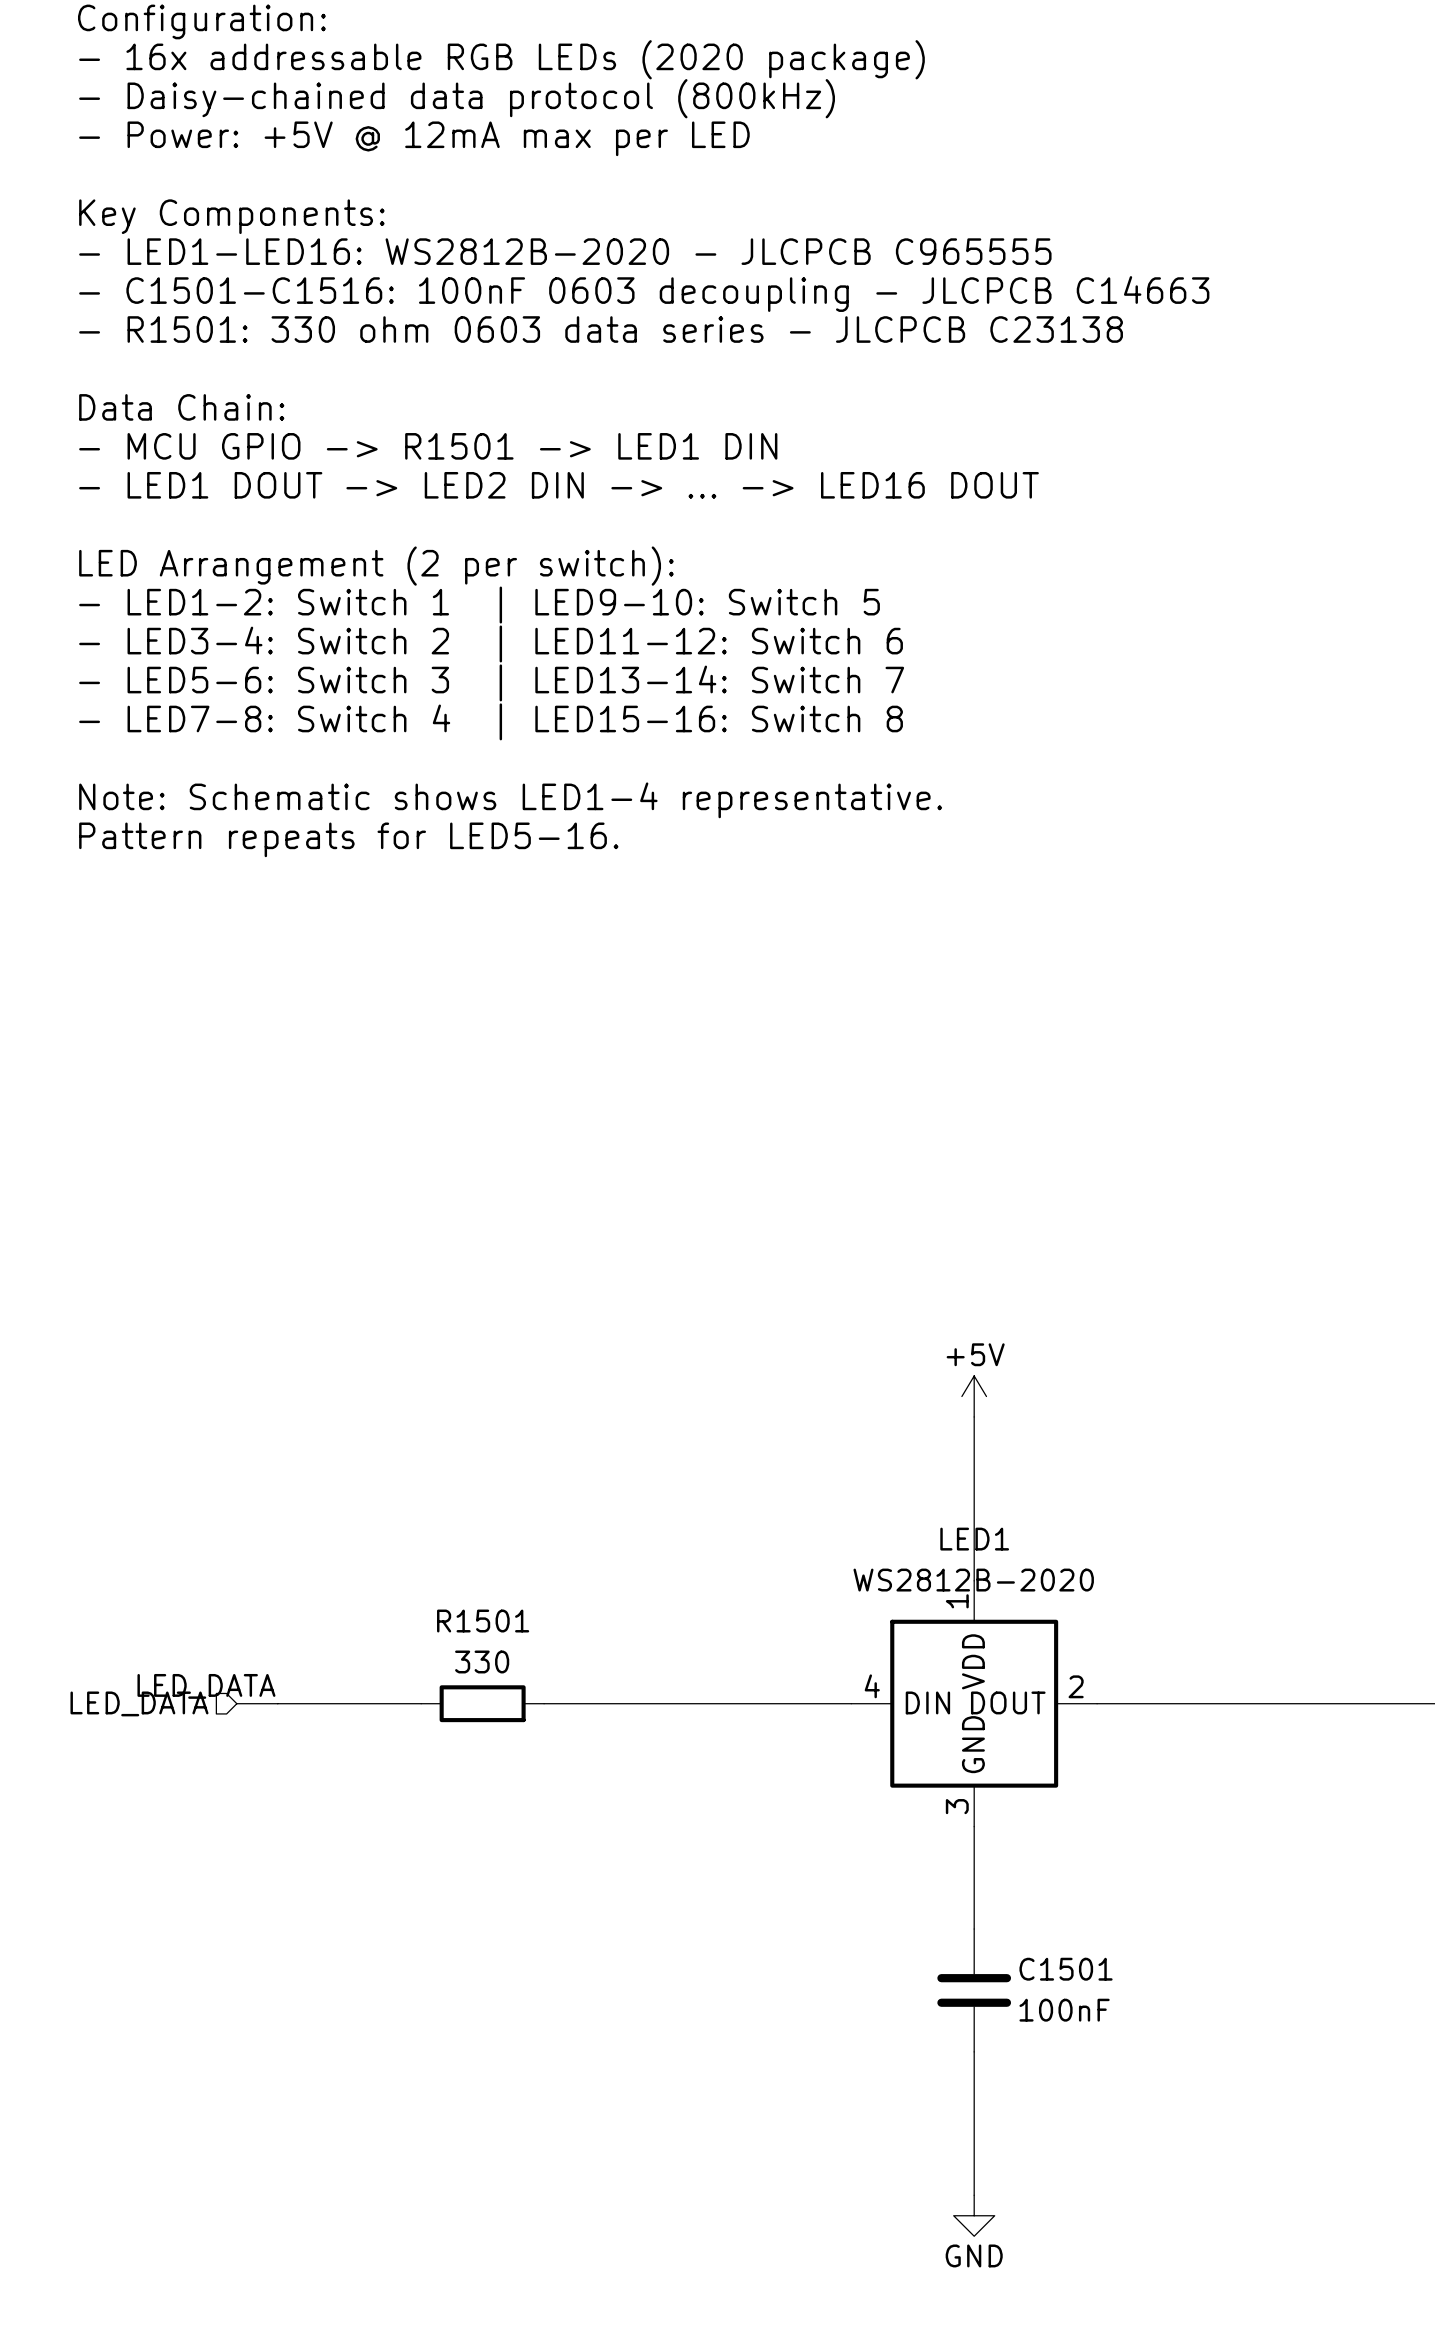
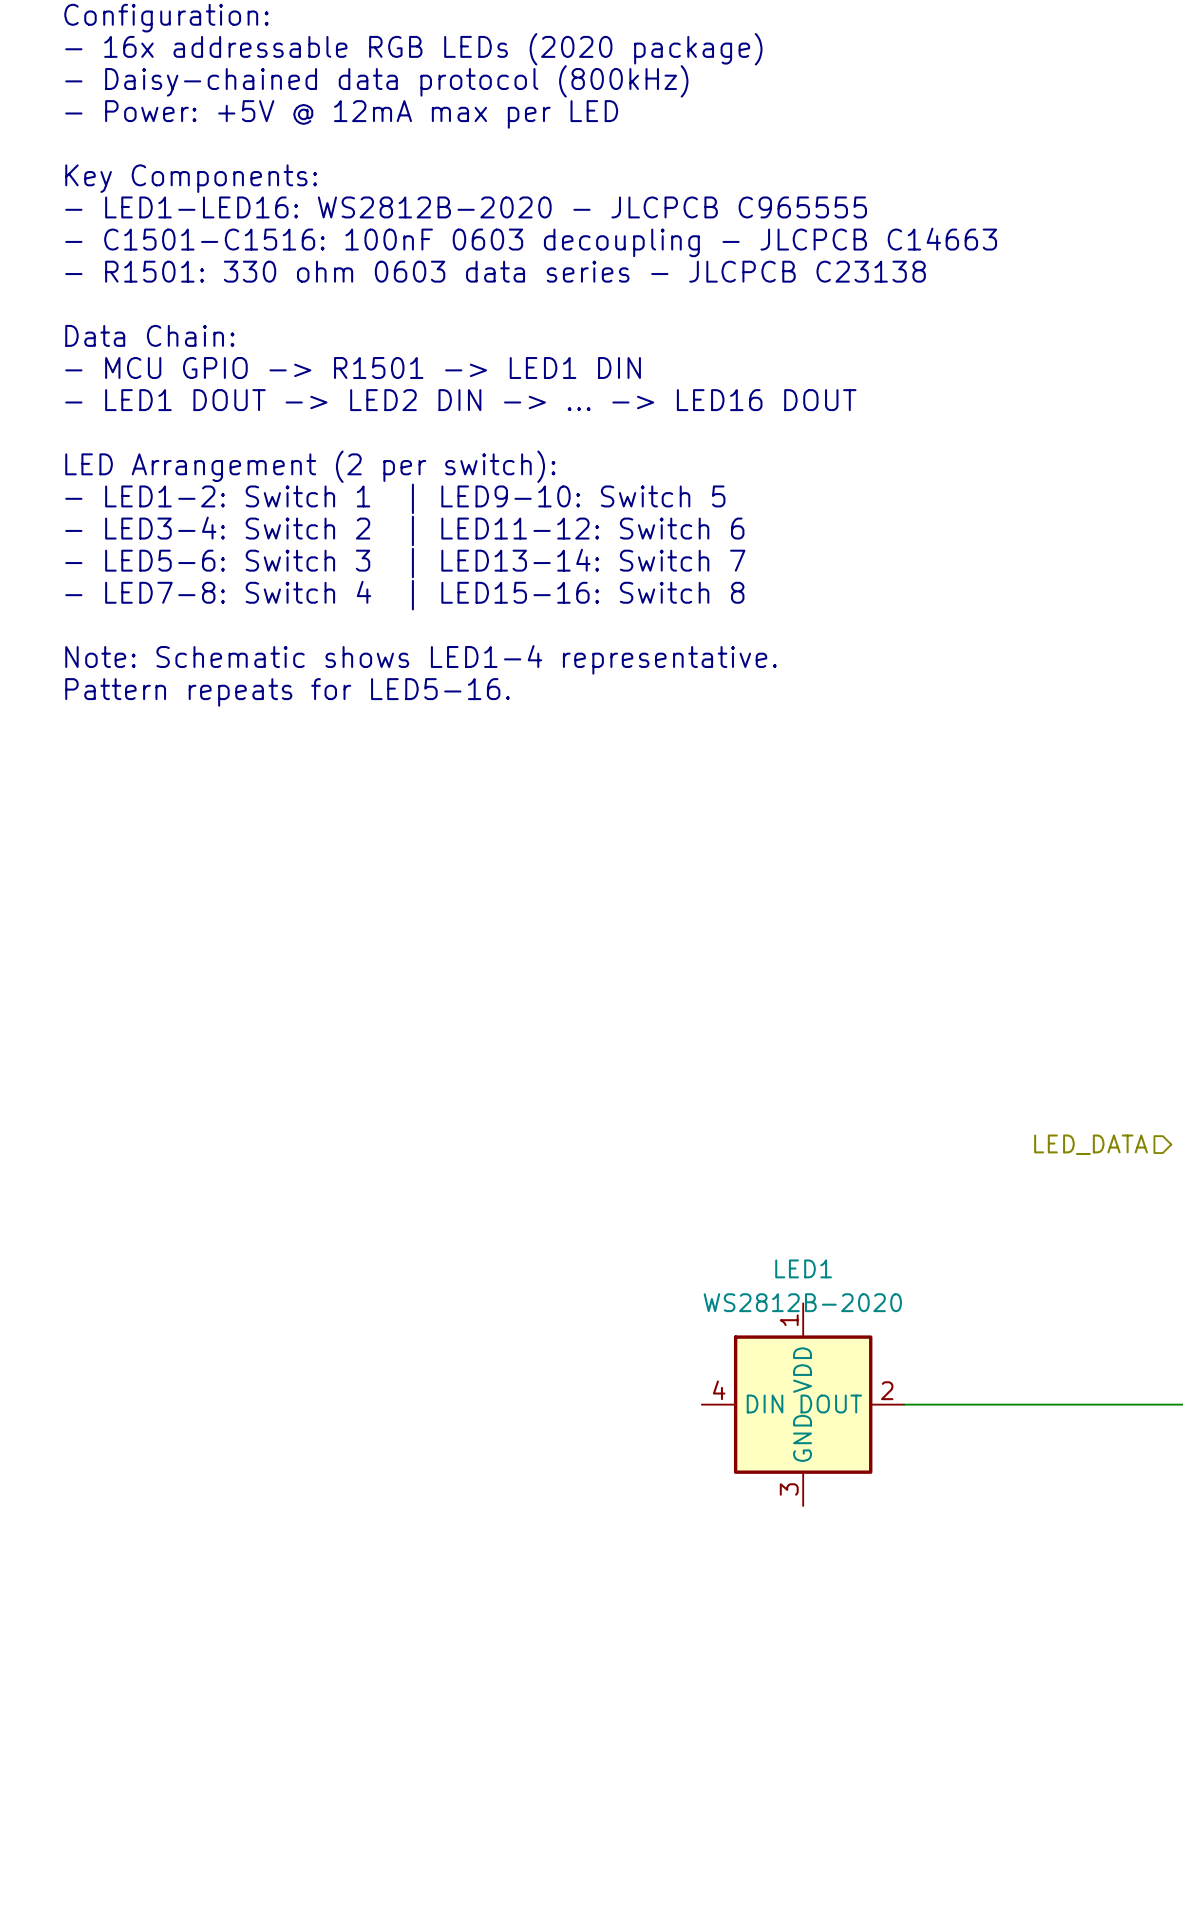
hierarchical label: none -> LED_DATA (1091, 1144)
power symbol: +5V (974, 1396) -> none
wire: (974, 1416) (974, 1580) -> none
label: LED_DATA (206, 1686) -> none
hierarchical label: LED_DATA (139, 1703) -> none
wire: (236, 1703) (421, 1703) -> none
R1501: 330 (482, 1703) -> none
wire: (544, 1703) (851, 1703) -> none
wire: (974, 1826) (974, 1929) -> none
C1501: 100nF (974, 1990) -> none
wire: (974, 2051) (974, 2195) -> none
power symbol: GND (974, 2215) -> none

